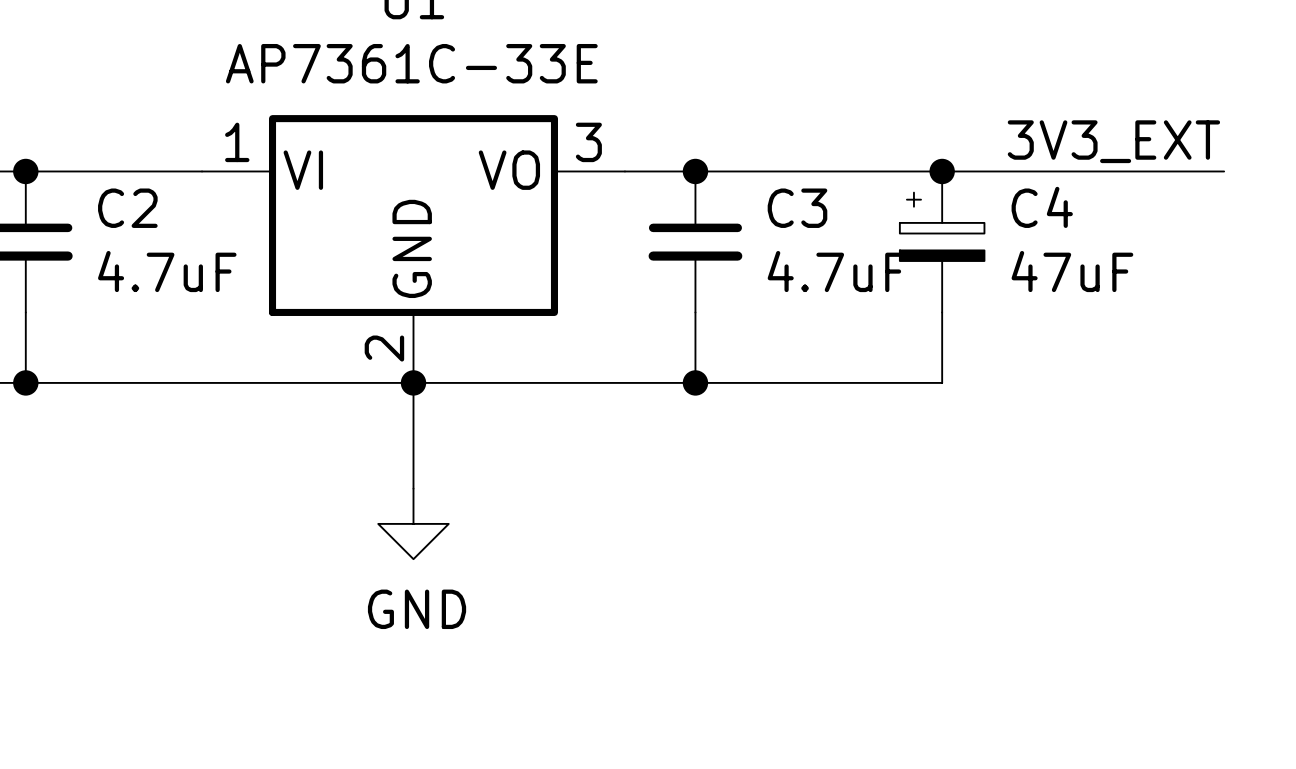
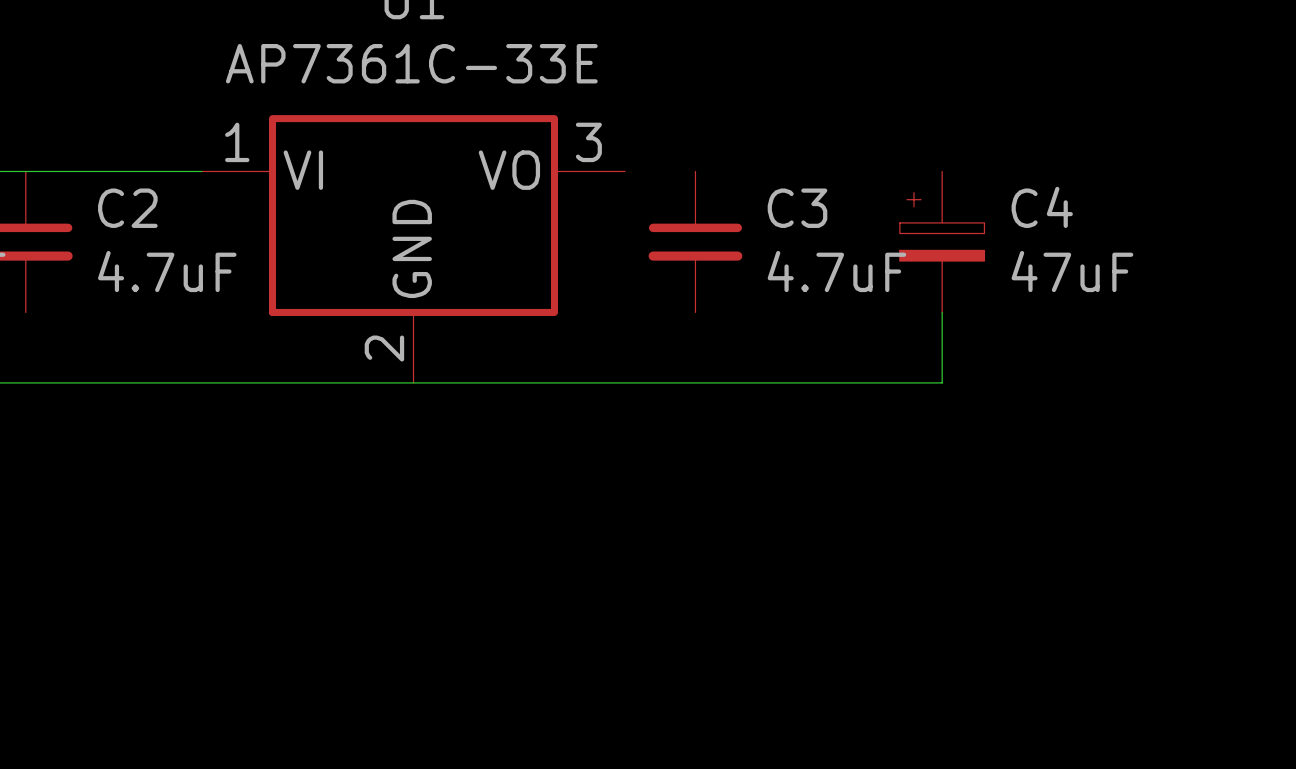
label: 3V3_EXT (1113, 141) -> none
junction: (25, 171) -> none
wire: (624, 171) (1224, 171) -> none
junction: (695, 171) -> none
junction: (942, 171) -> none
wire: (25, 312) (25, 382) -> none
wire: (695, 312) (695, 382) -> none
junction: (25, 382) -> none
wire: (413, 382) (413, 488) -> none
junction: (413, 382) -> none
junction: (695, 382) -> none
power symbol: GND (413, 523) -> none

